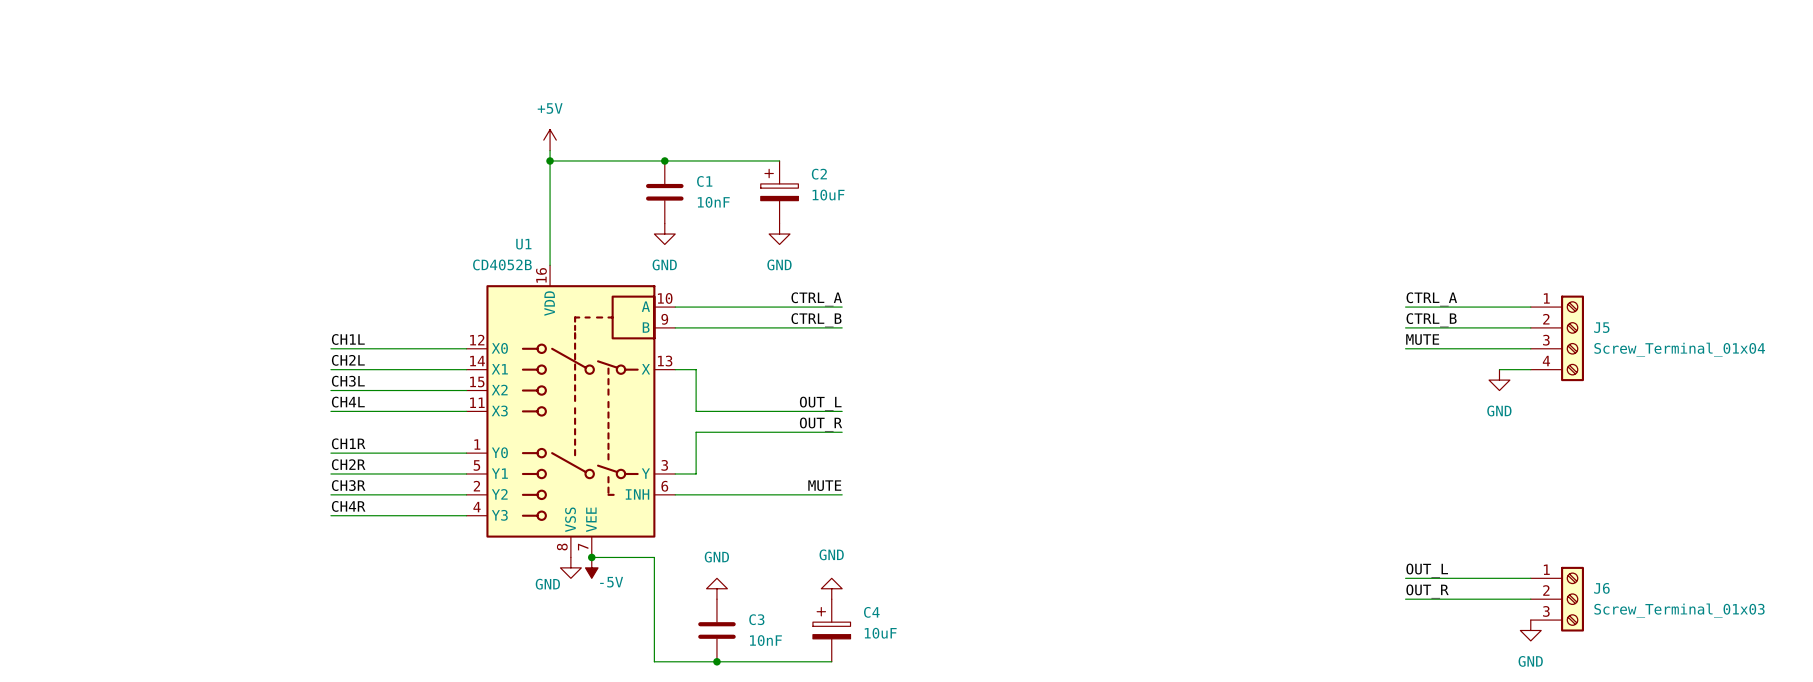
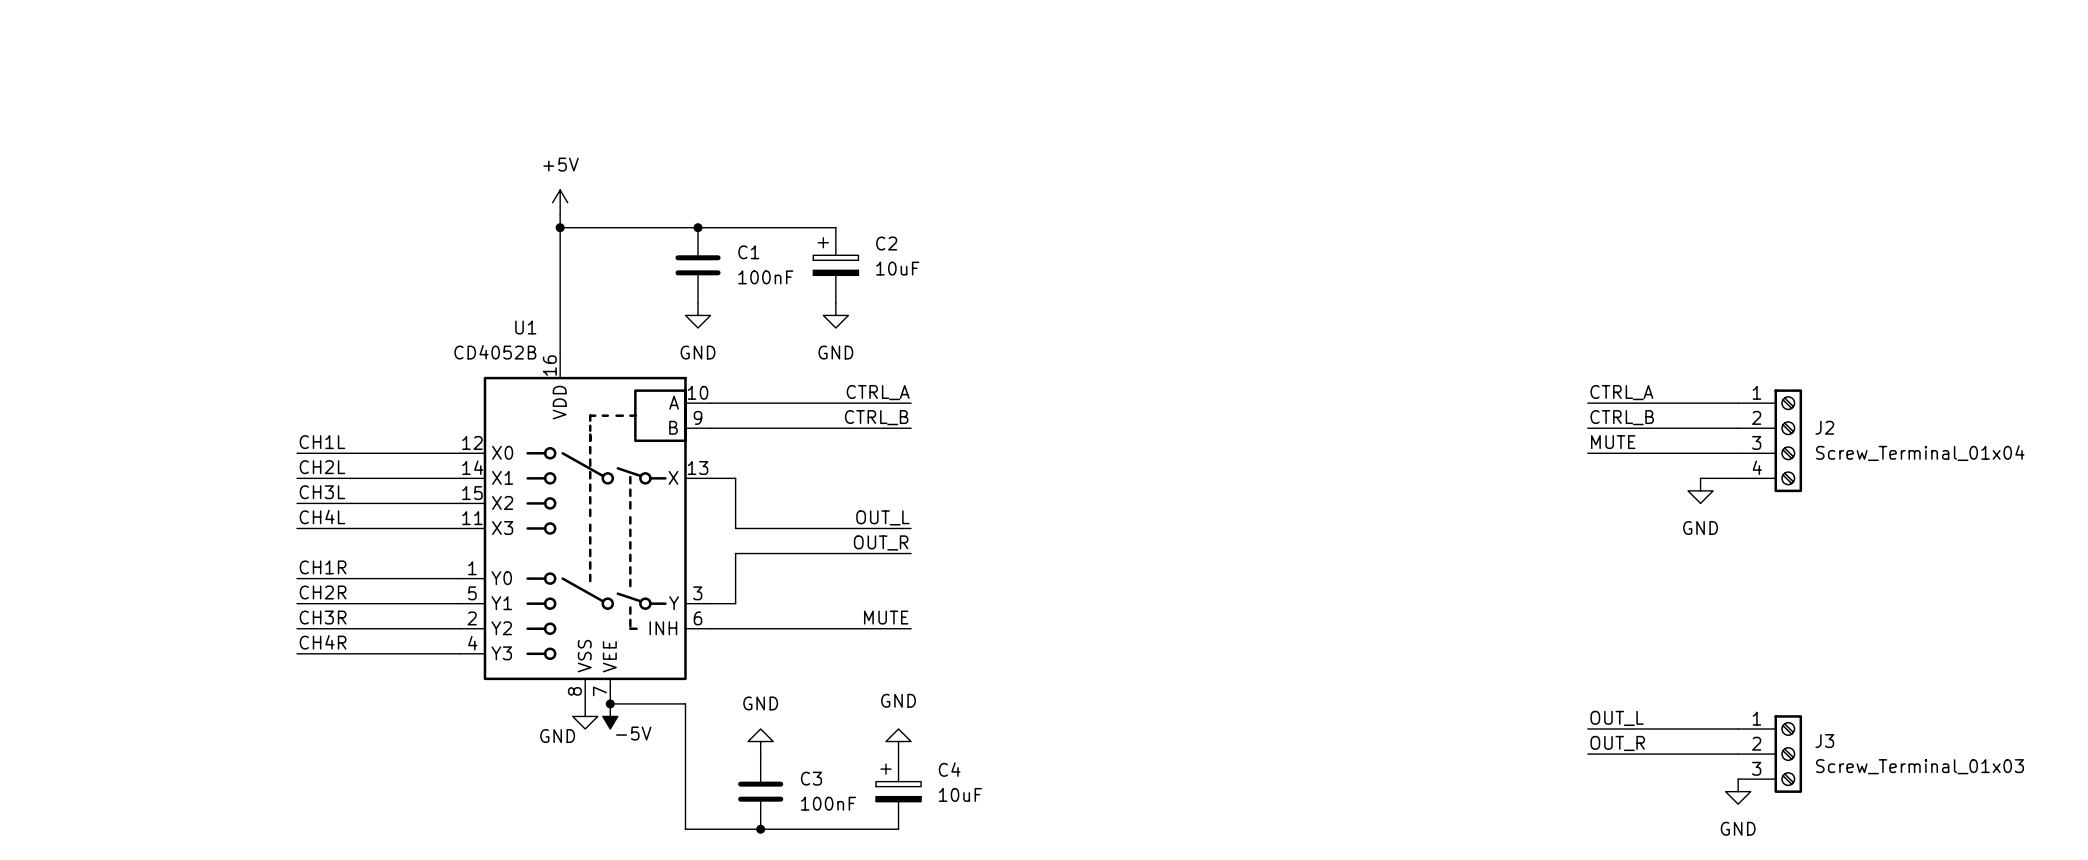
C1 value: 10nF (713, 202) -> 100nF (765, 277)
J5 name: J5 (1601, 327) -> J2 (1824, 427)
J6 name: J6 (1601, 588) -> J3 (1824, 741)
C3 value: 10nF (765, 640) -> 100nF (828, 803)

